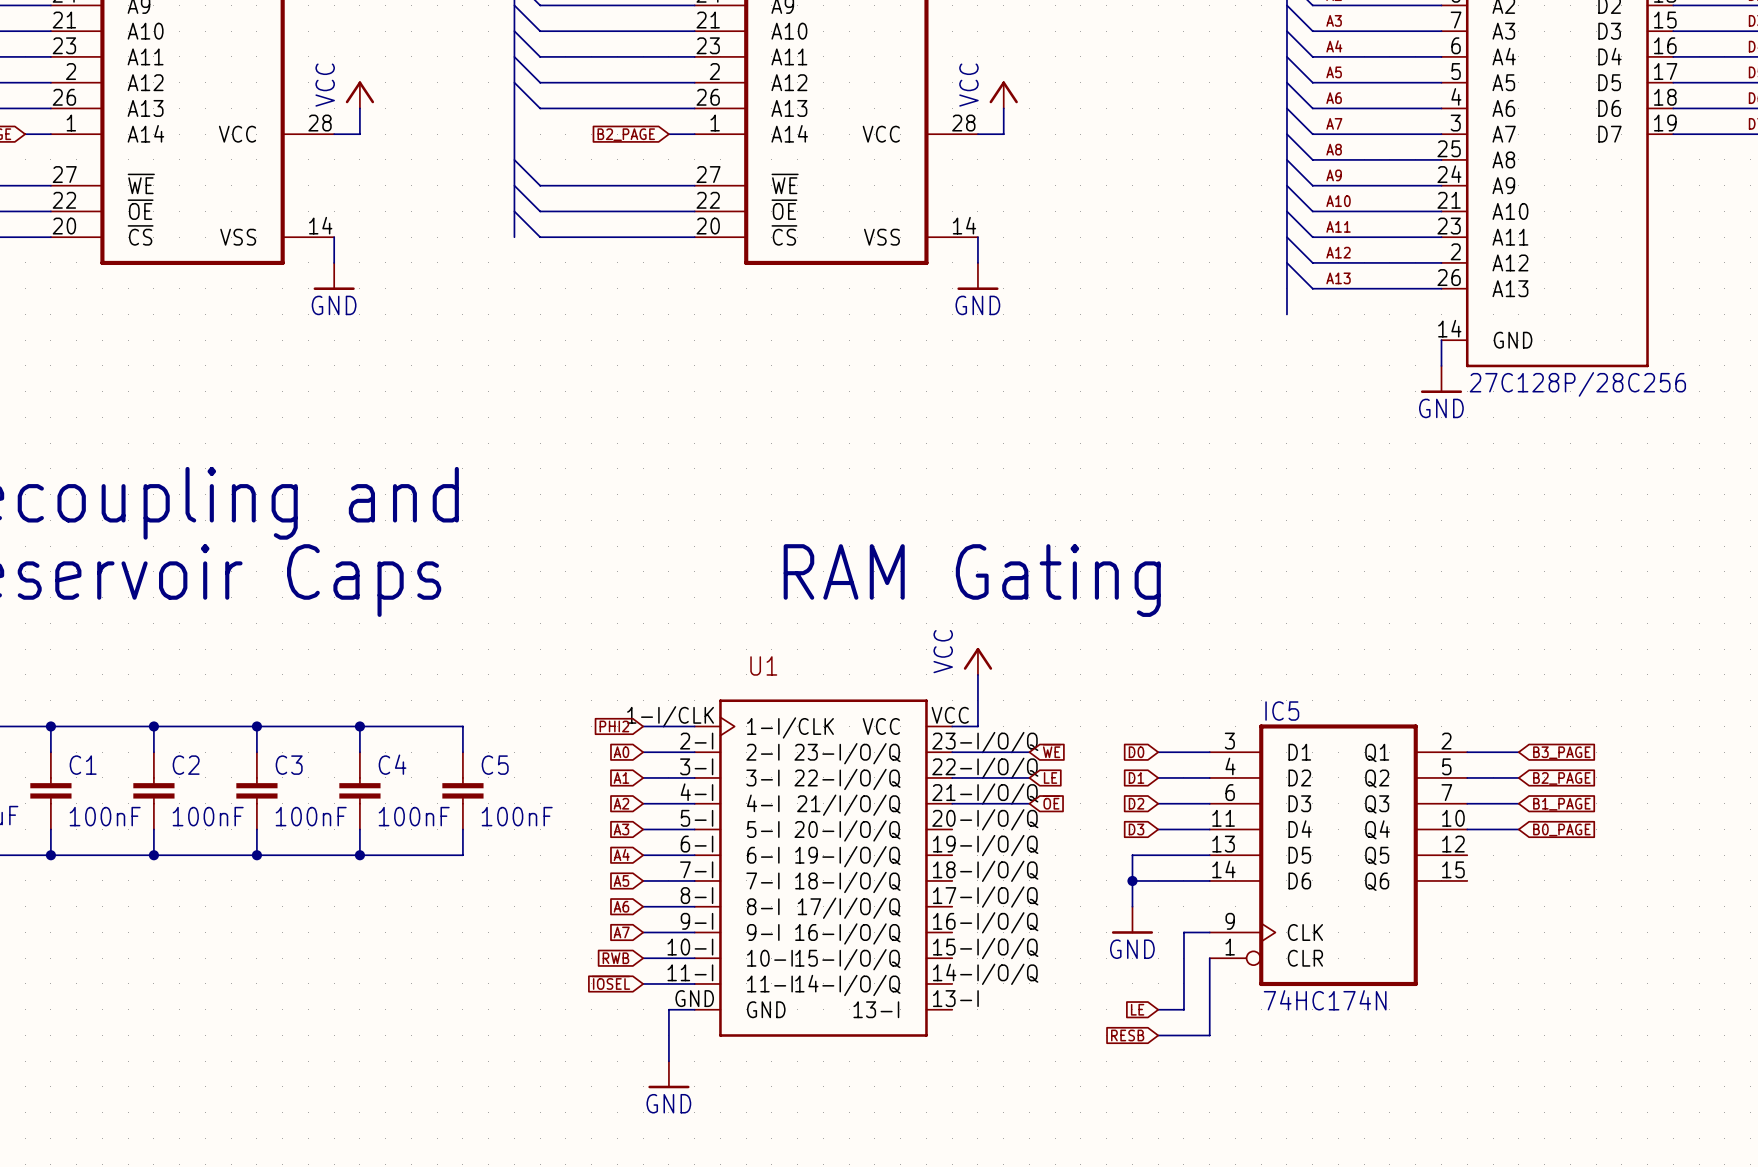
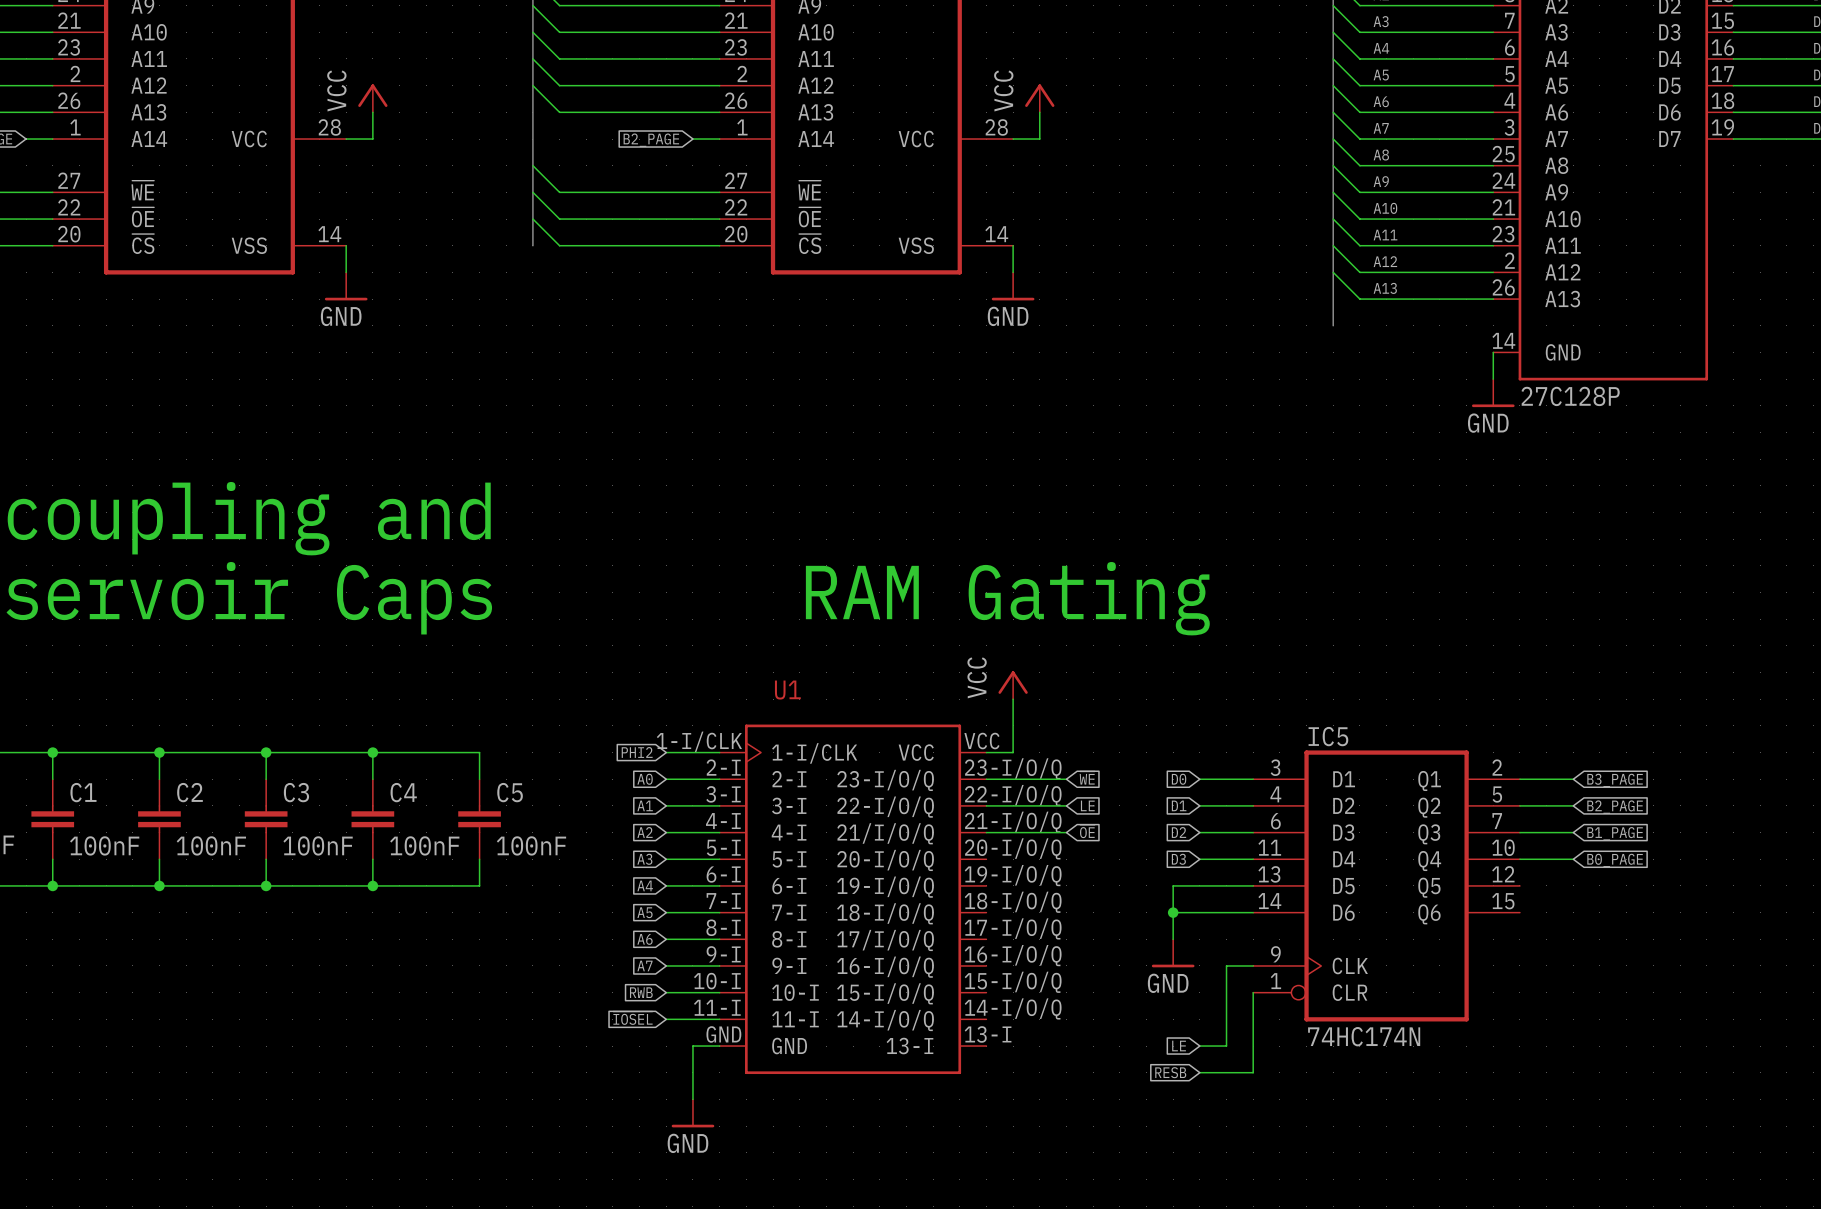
part value: 27C128P/28C256 (1577, 384) -> 27C128P (1570, 396)

